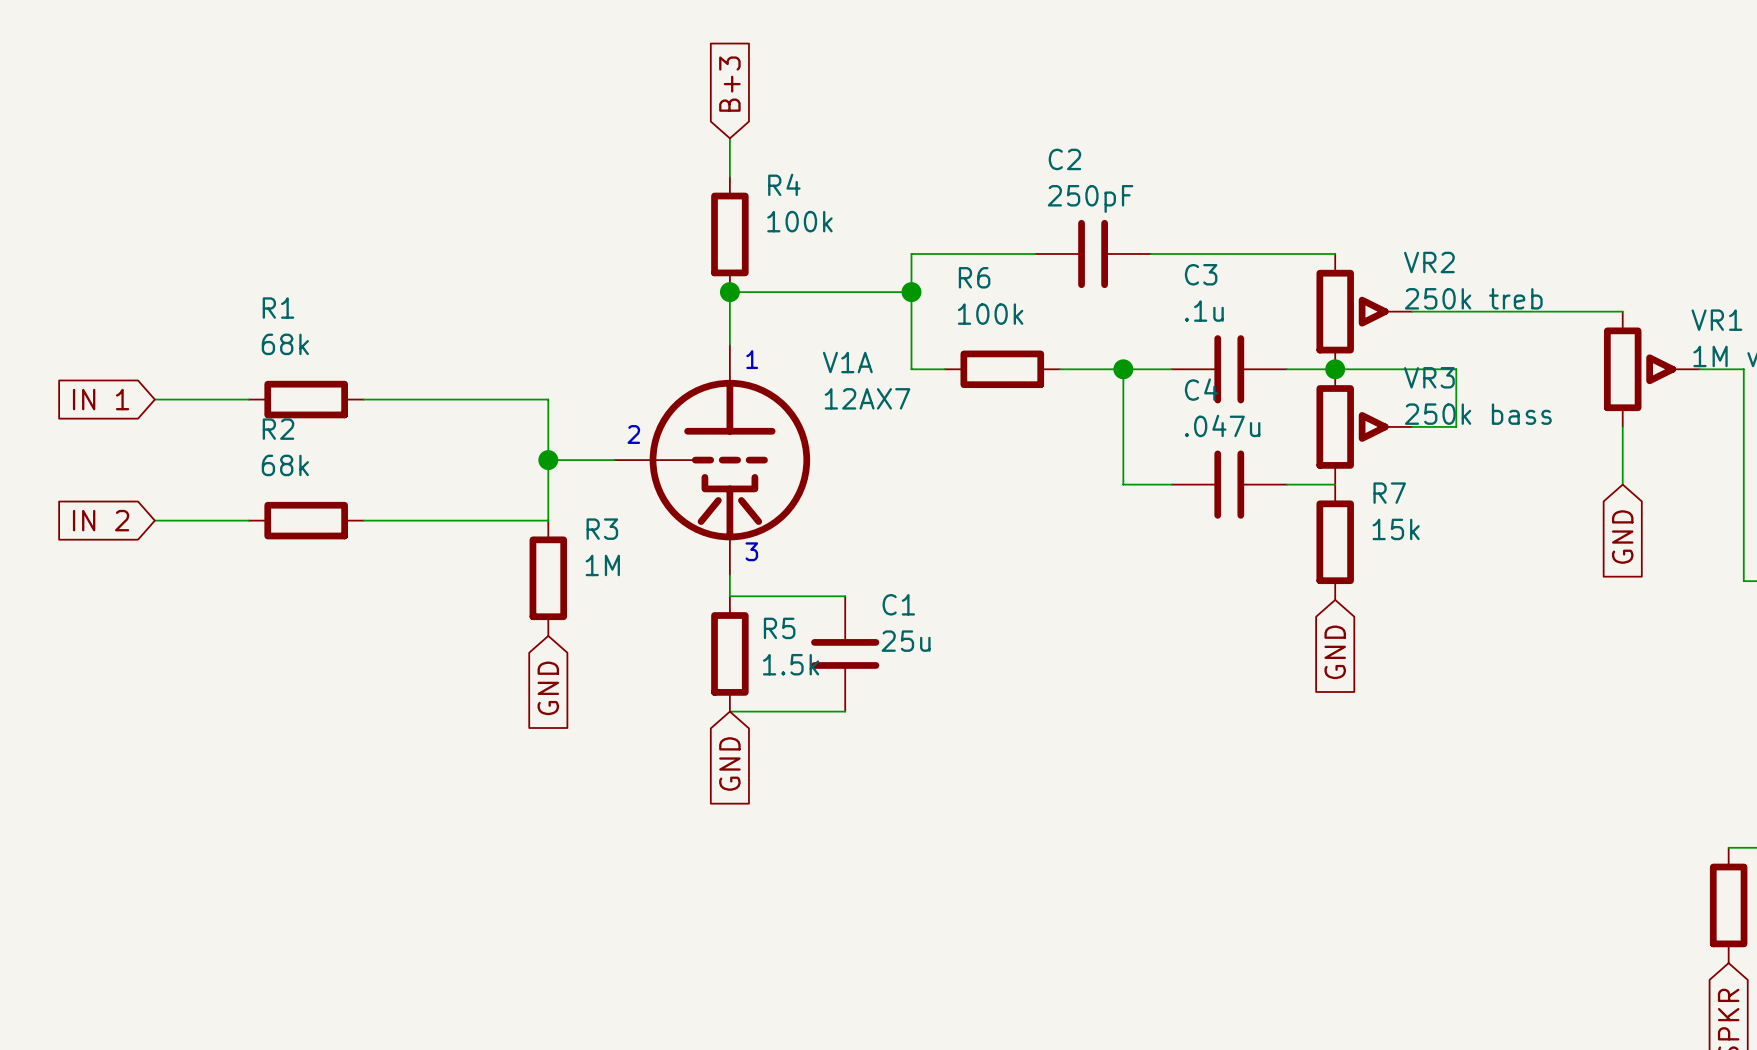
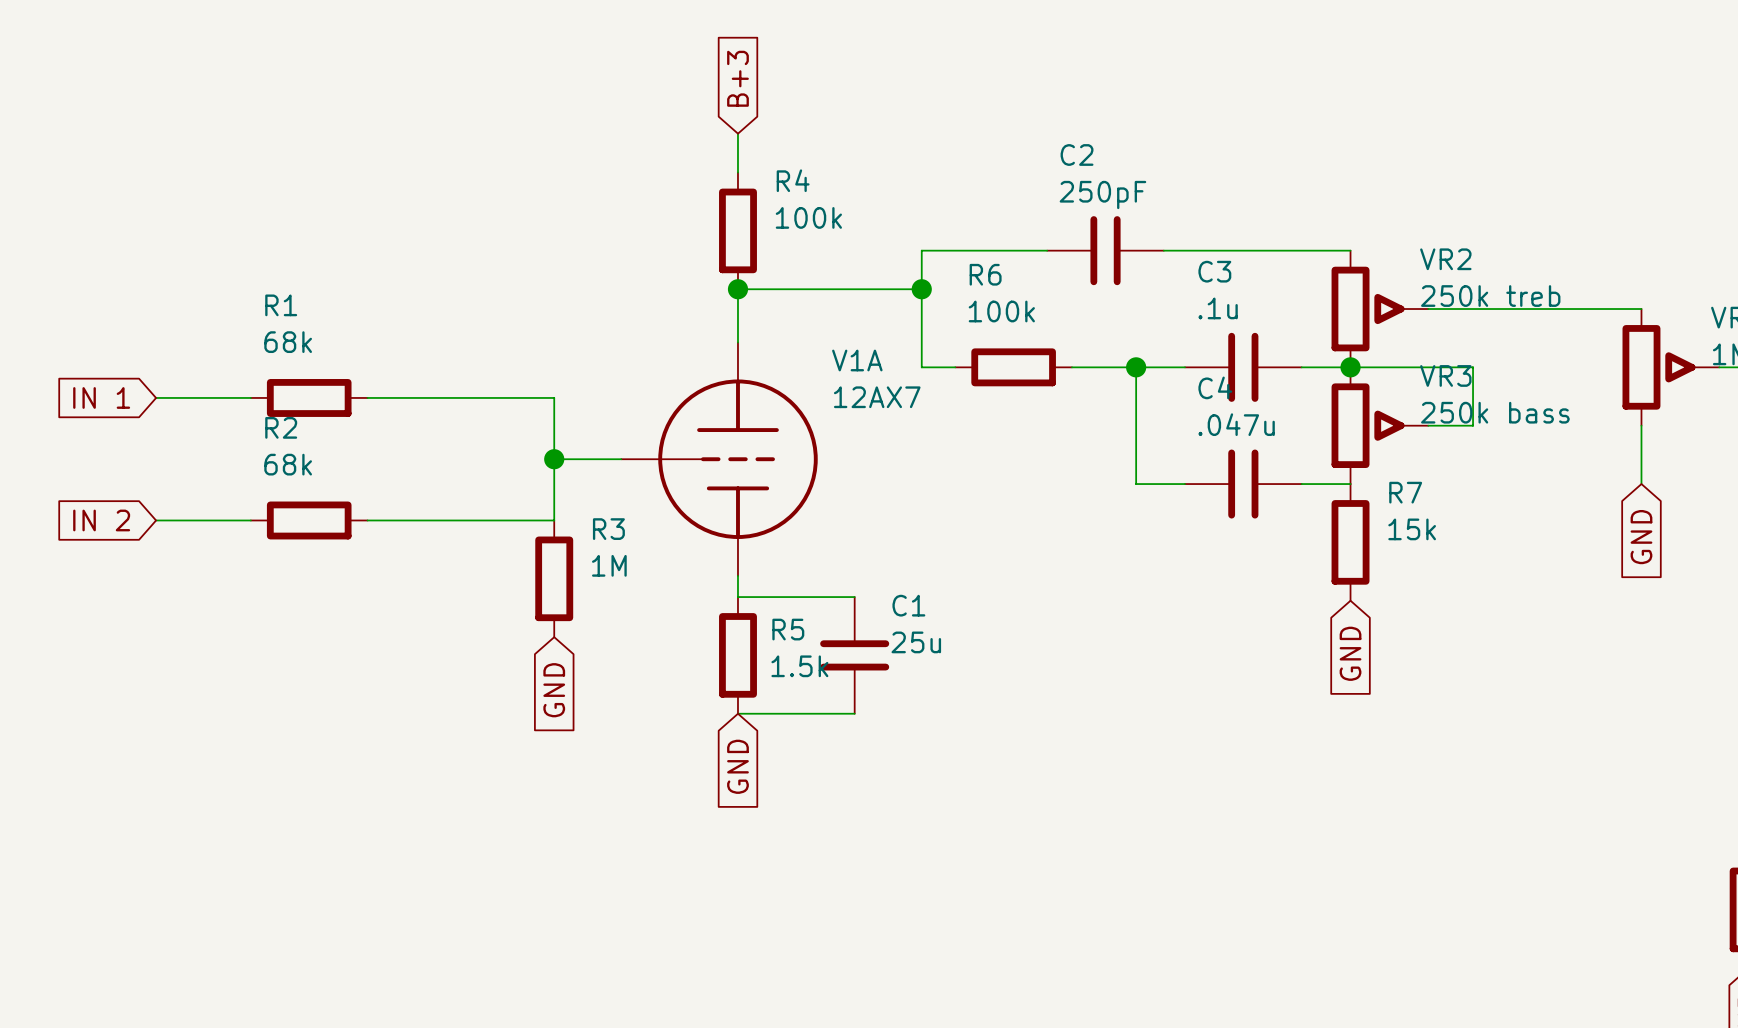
V1A symbol: [614, 344, 811, 576] -> [621, 342, 818, 576]
text: 1 (752, 359) -> none
text: 2 (633, 434) -> none
text: 3 (751, 551) -> none

